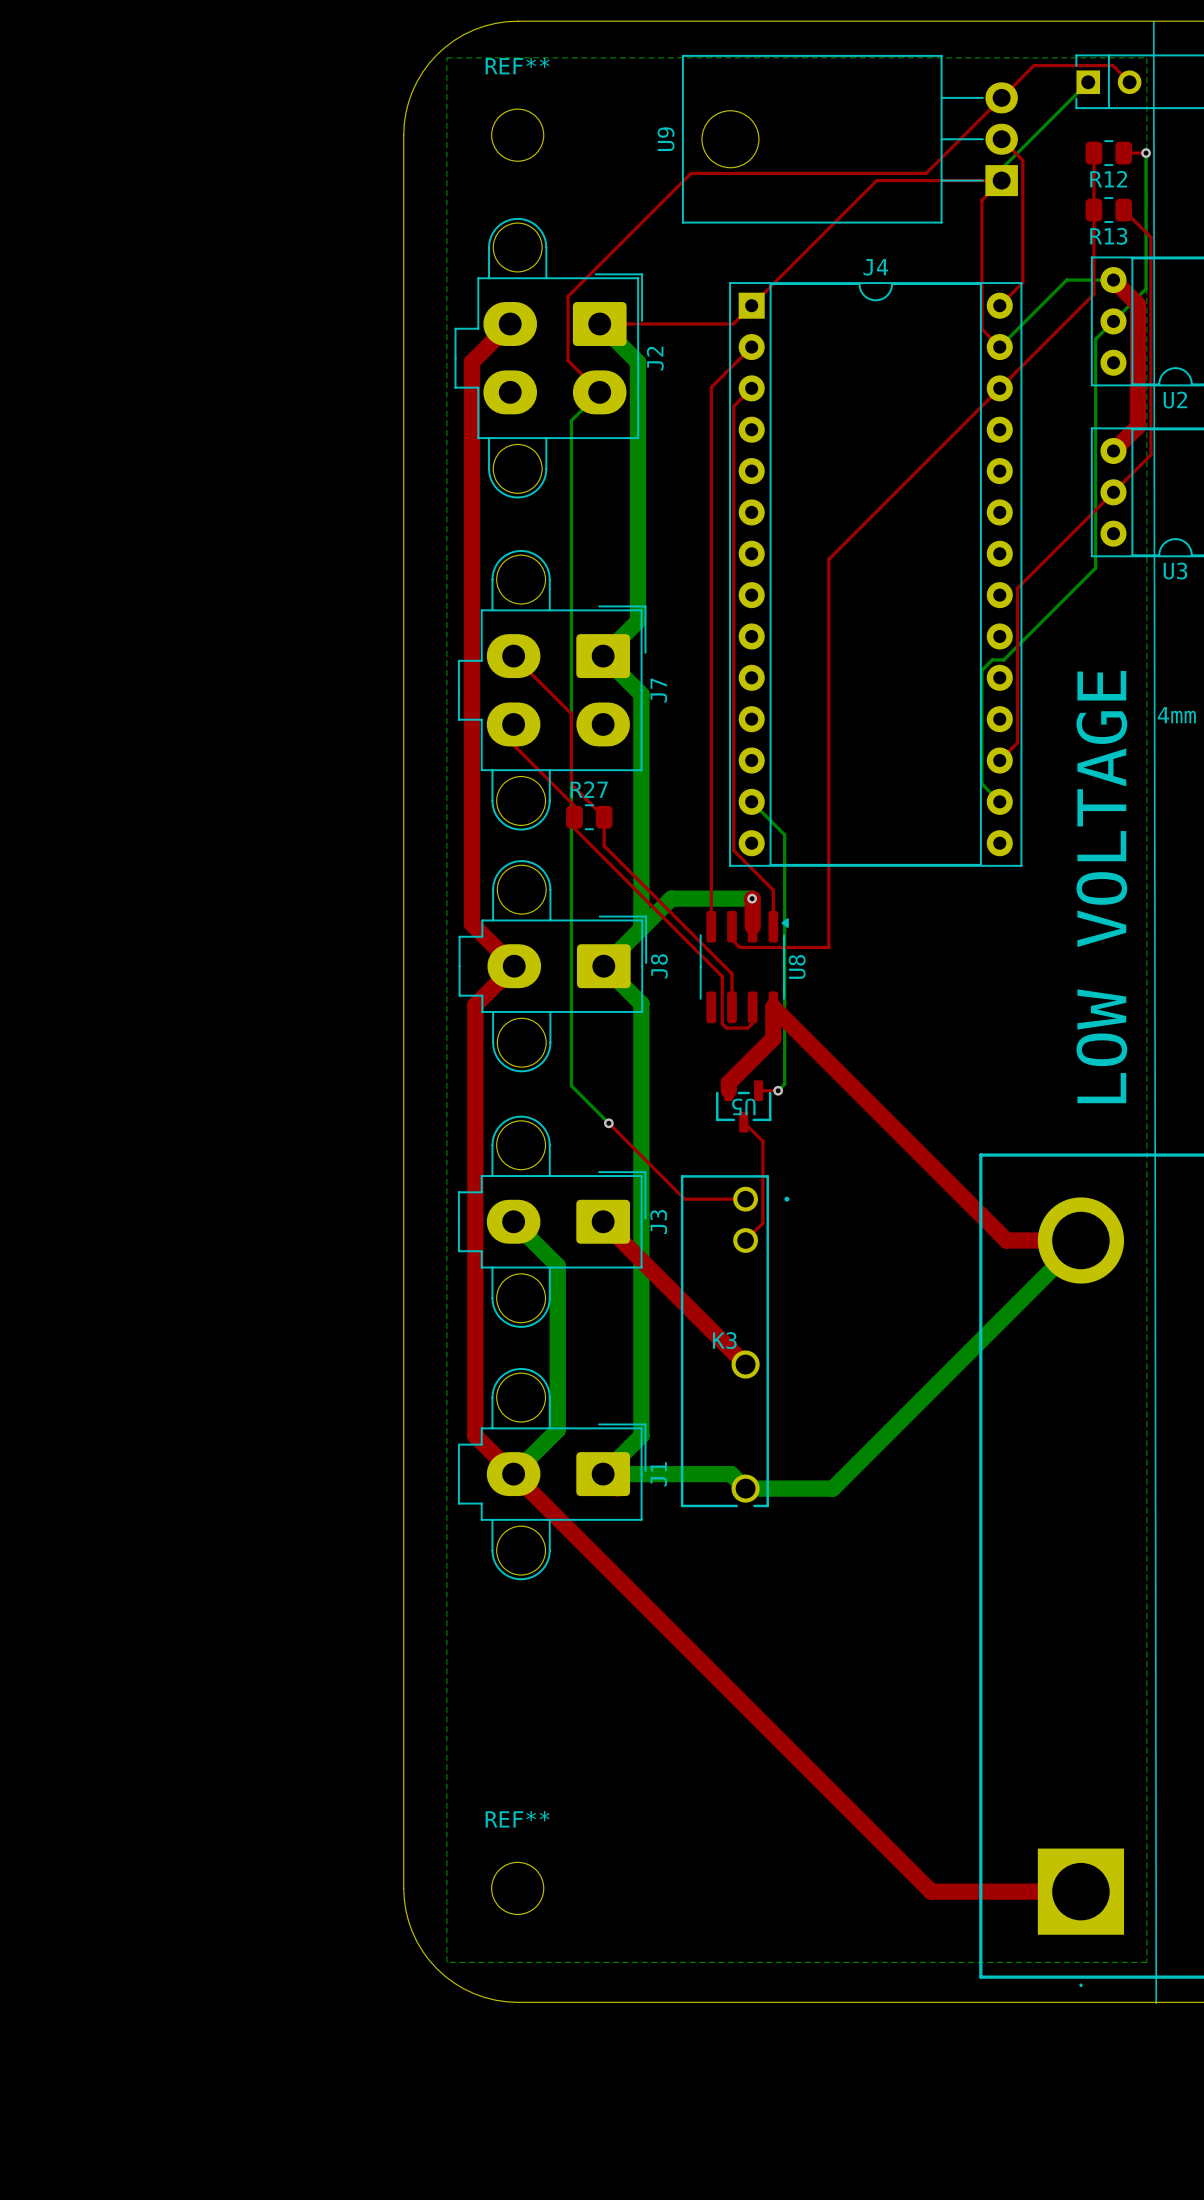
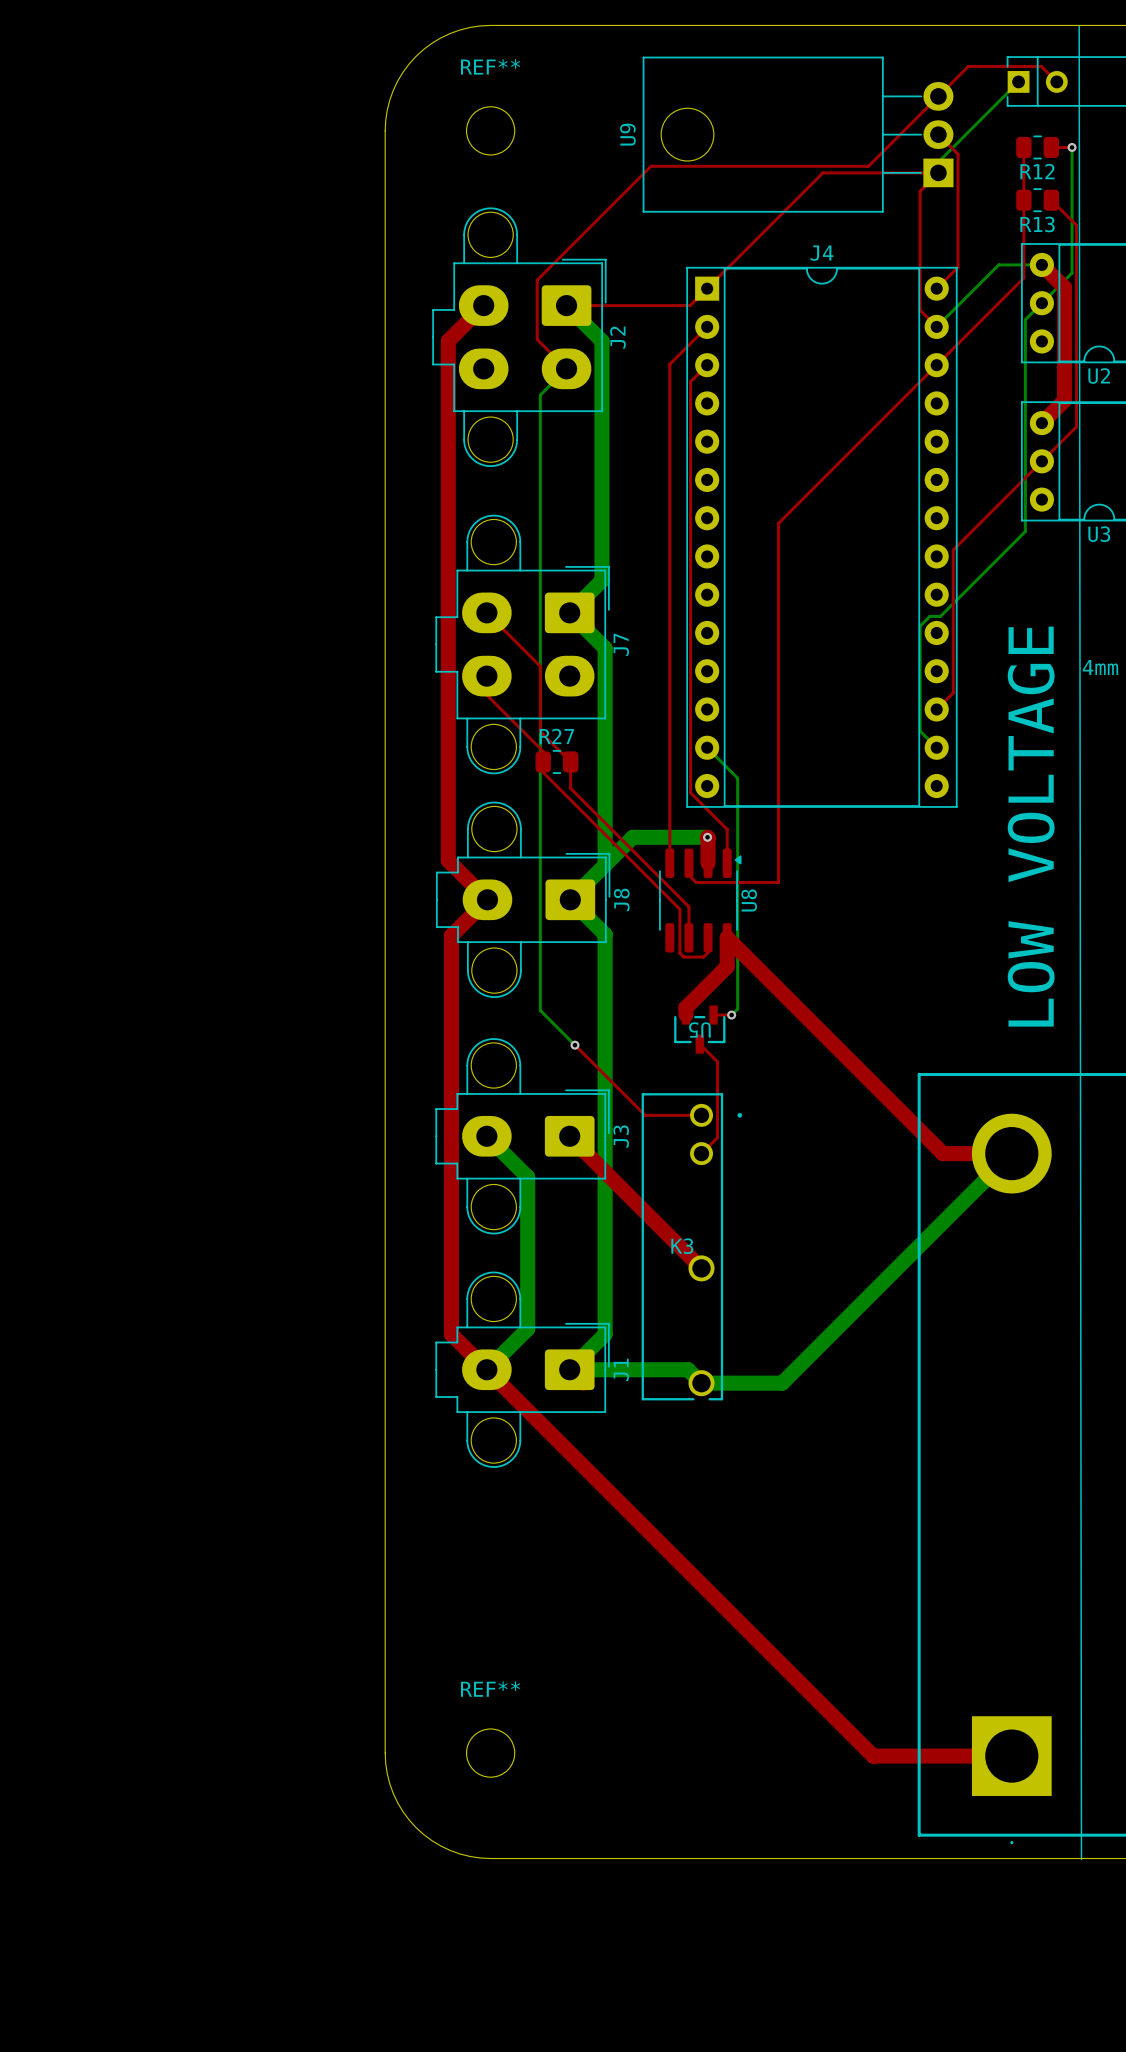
bottom zone outline: (446, 57) (1146, 57) (1146, 1962) (446, 1962) (446, 57) -> none

